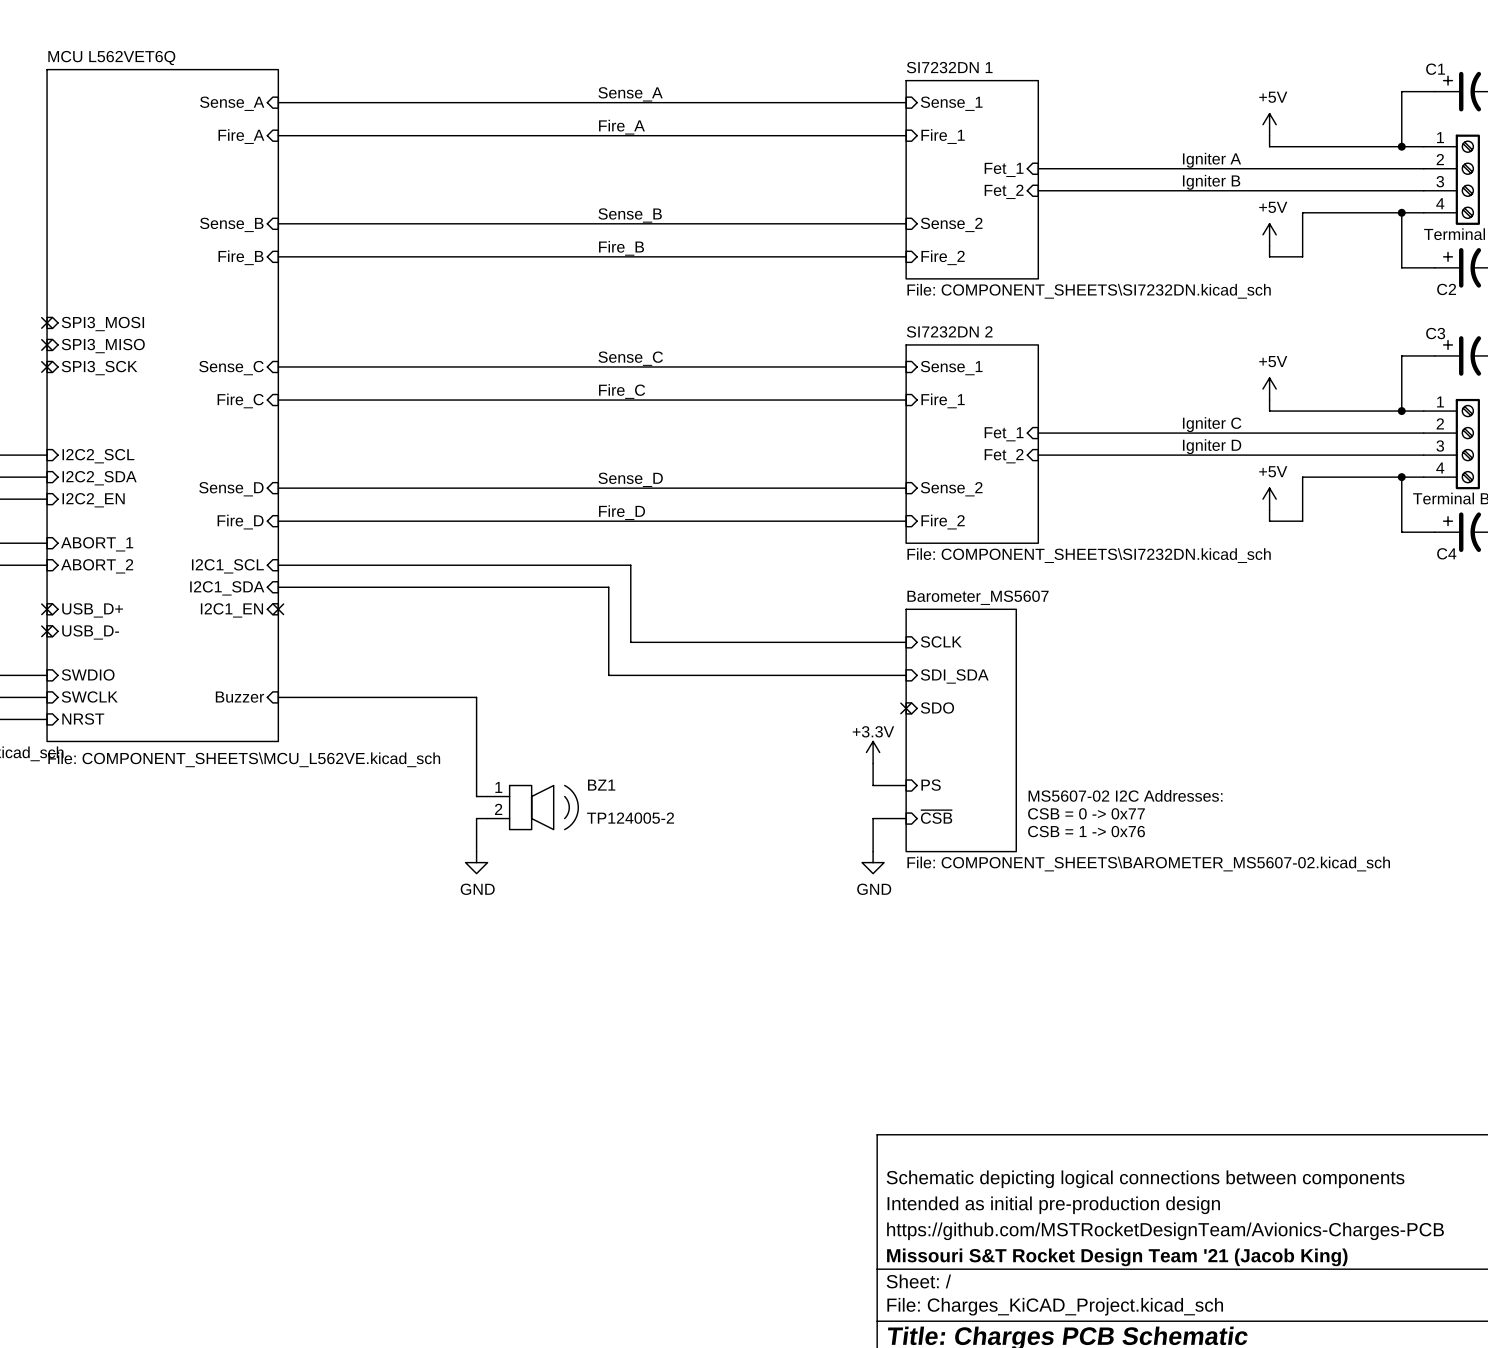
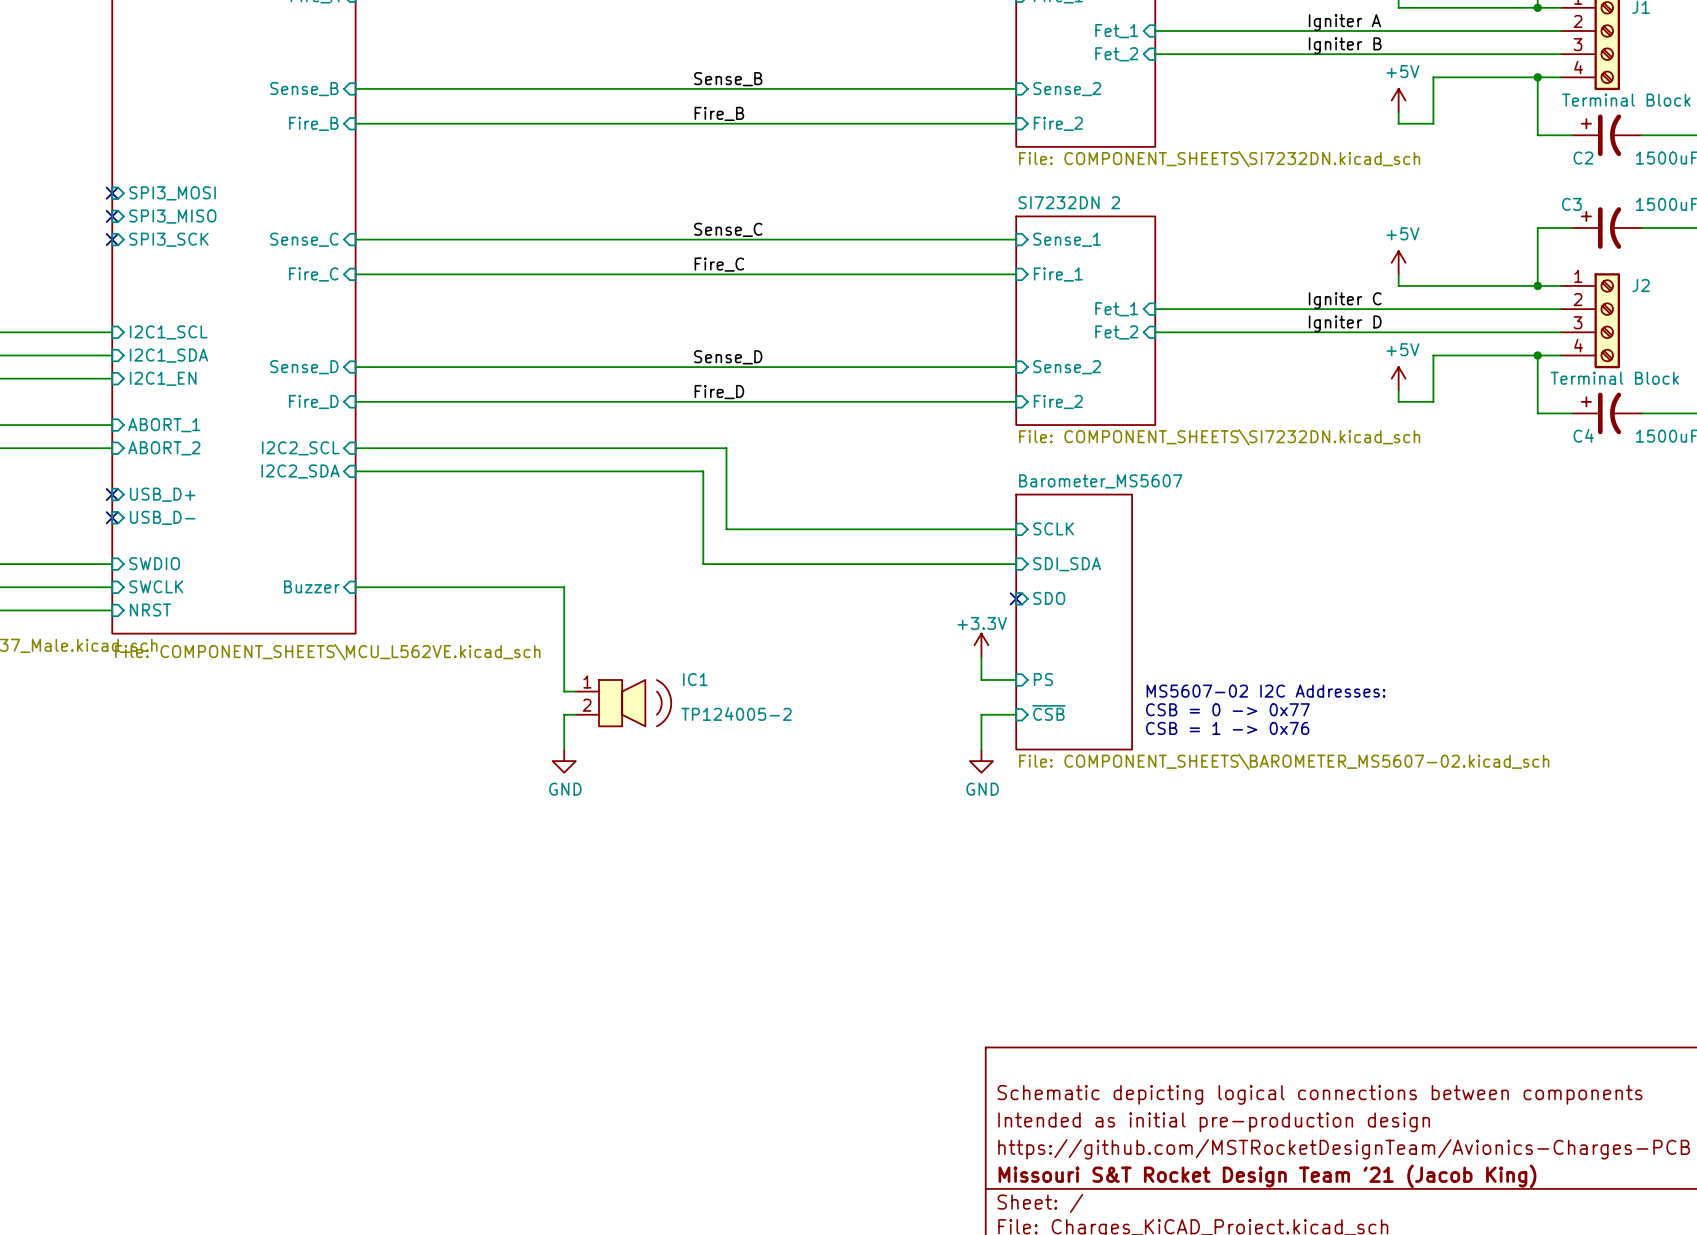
sheet pin: I2C2_SCL (98, 456) -> I2C1_SCL (168, 332)
sheet pin: I2C2_SDA (99, 478) -> I2C1_SDA (168, 355)
sheet pin: I2C2_EN (93, 500) -> I2C1_EN (163, 378)
sheet pin: I2C1_SCL (227, 566) -> I2C2_SCL (300, 448)
sheet pin: I2C1_SDA (227, 588) -> I2C2_SDA (300, 471)
no-connect mark: (278, 609) -> none
sheet pin: I2C1_EN (231, 610) -> none
BZ1 name: BZ1 (601, 785) -> IC1 (695, 679)

